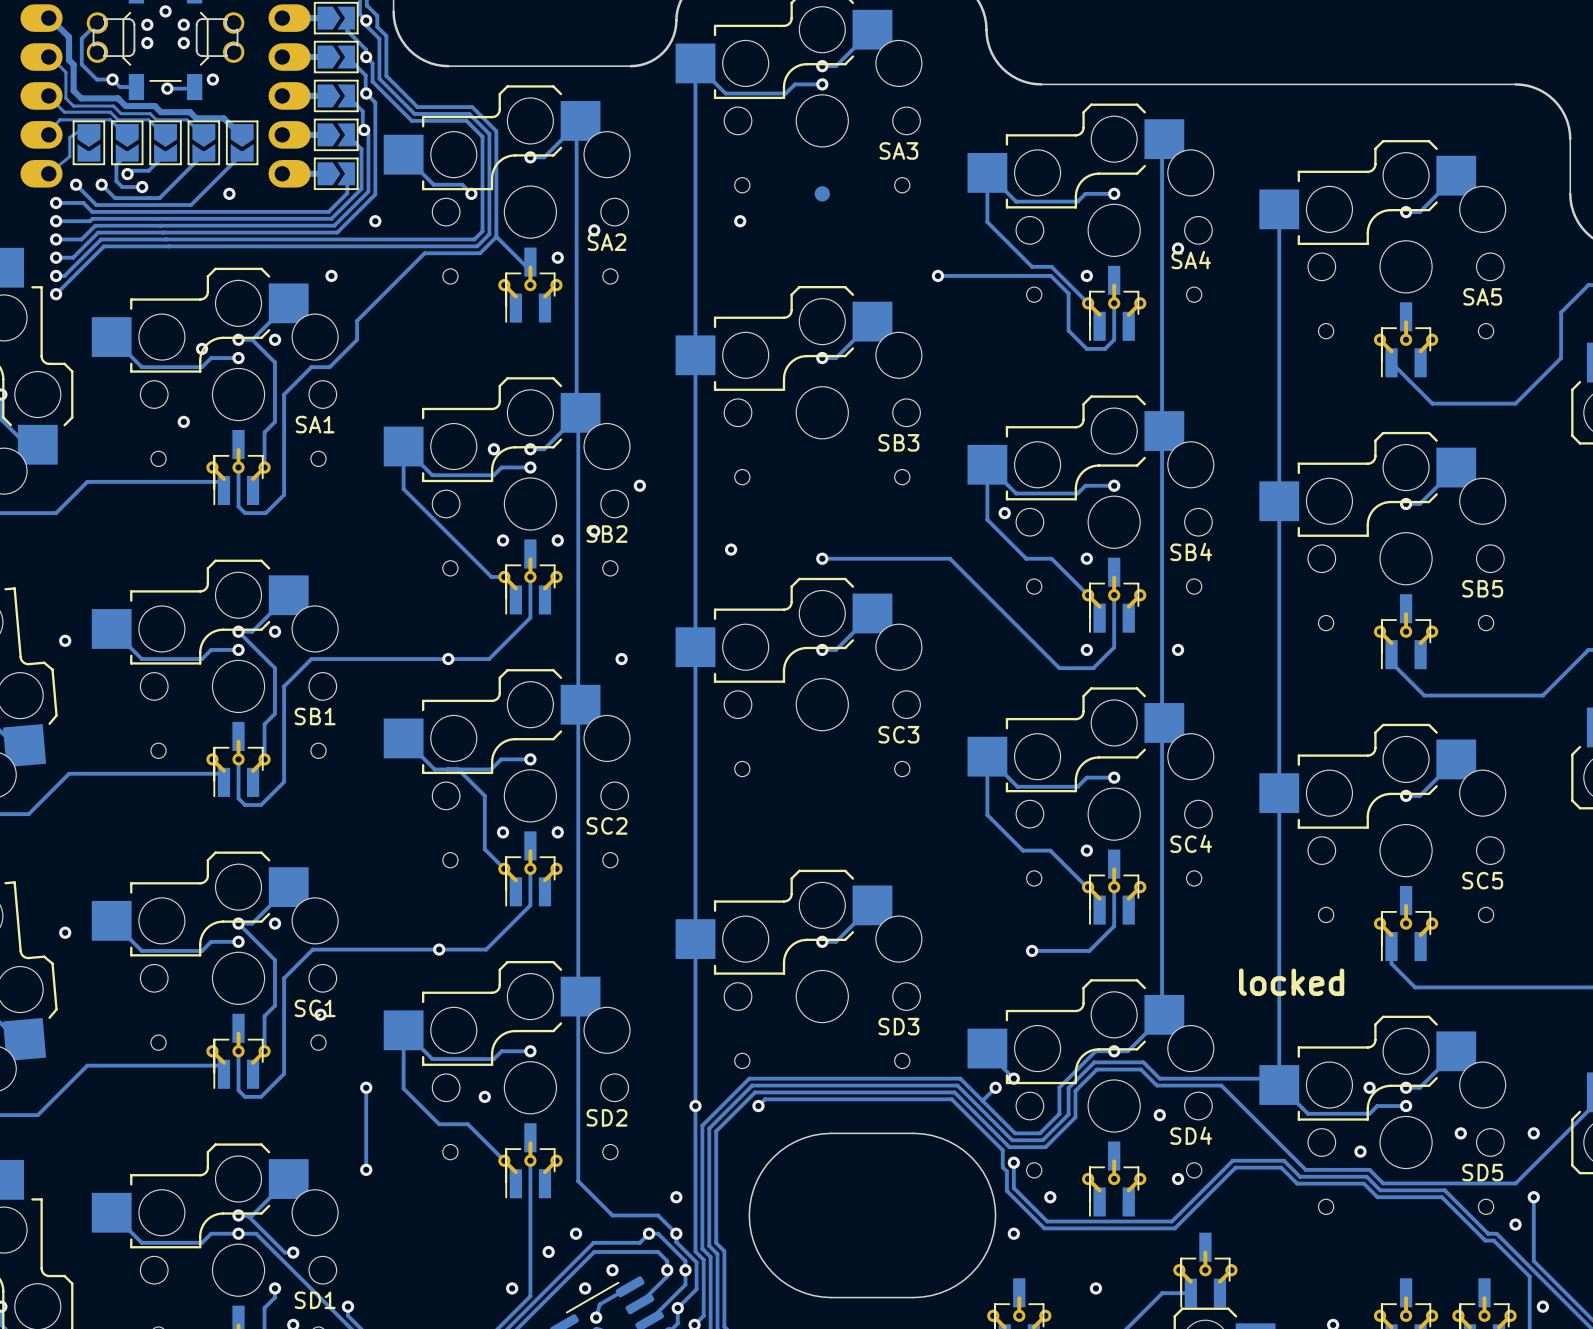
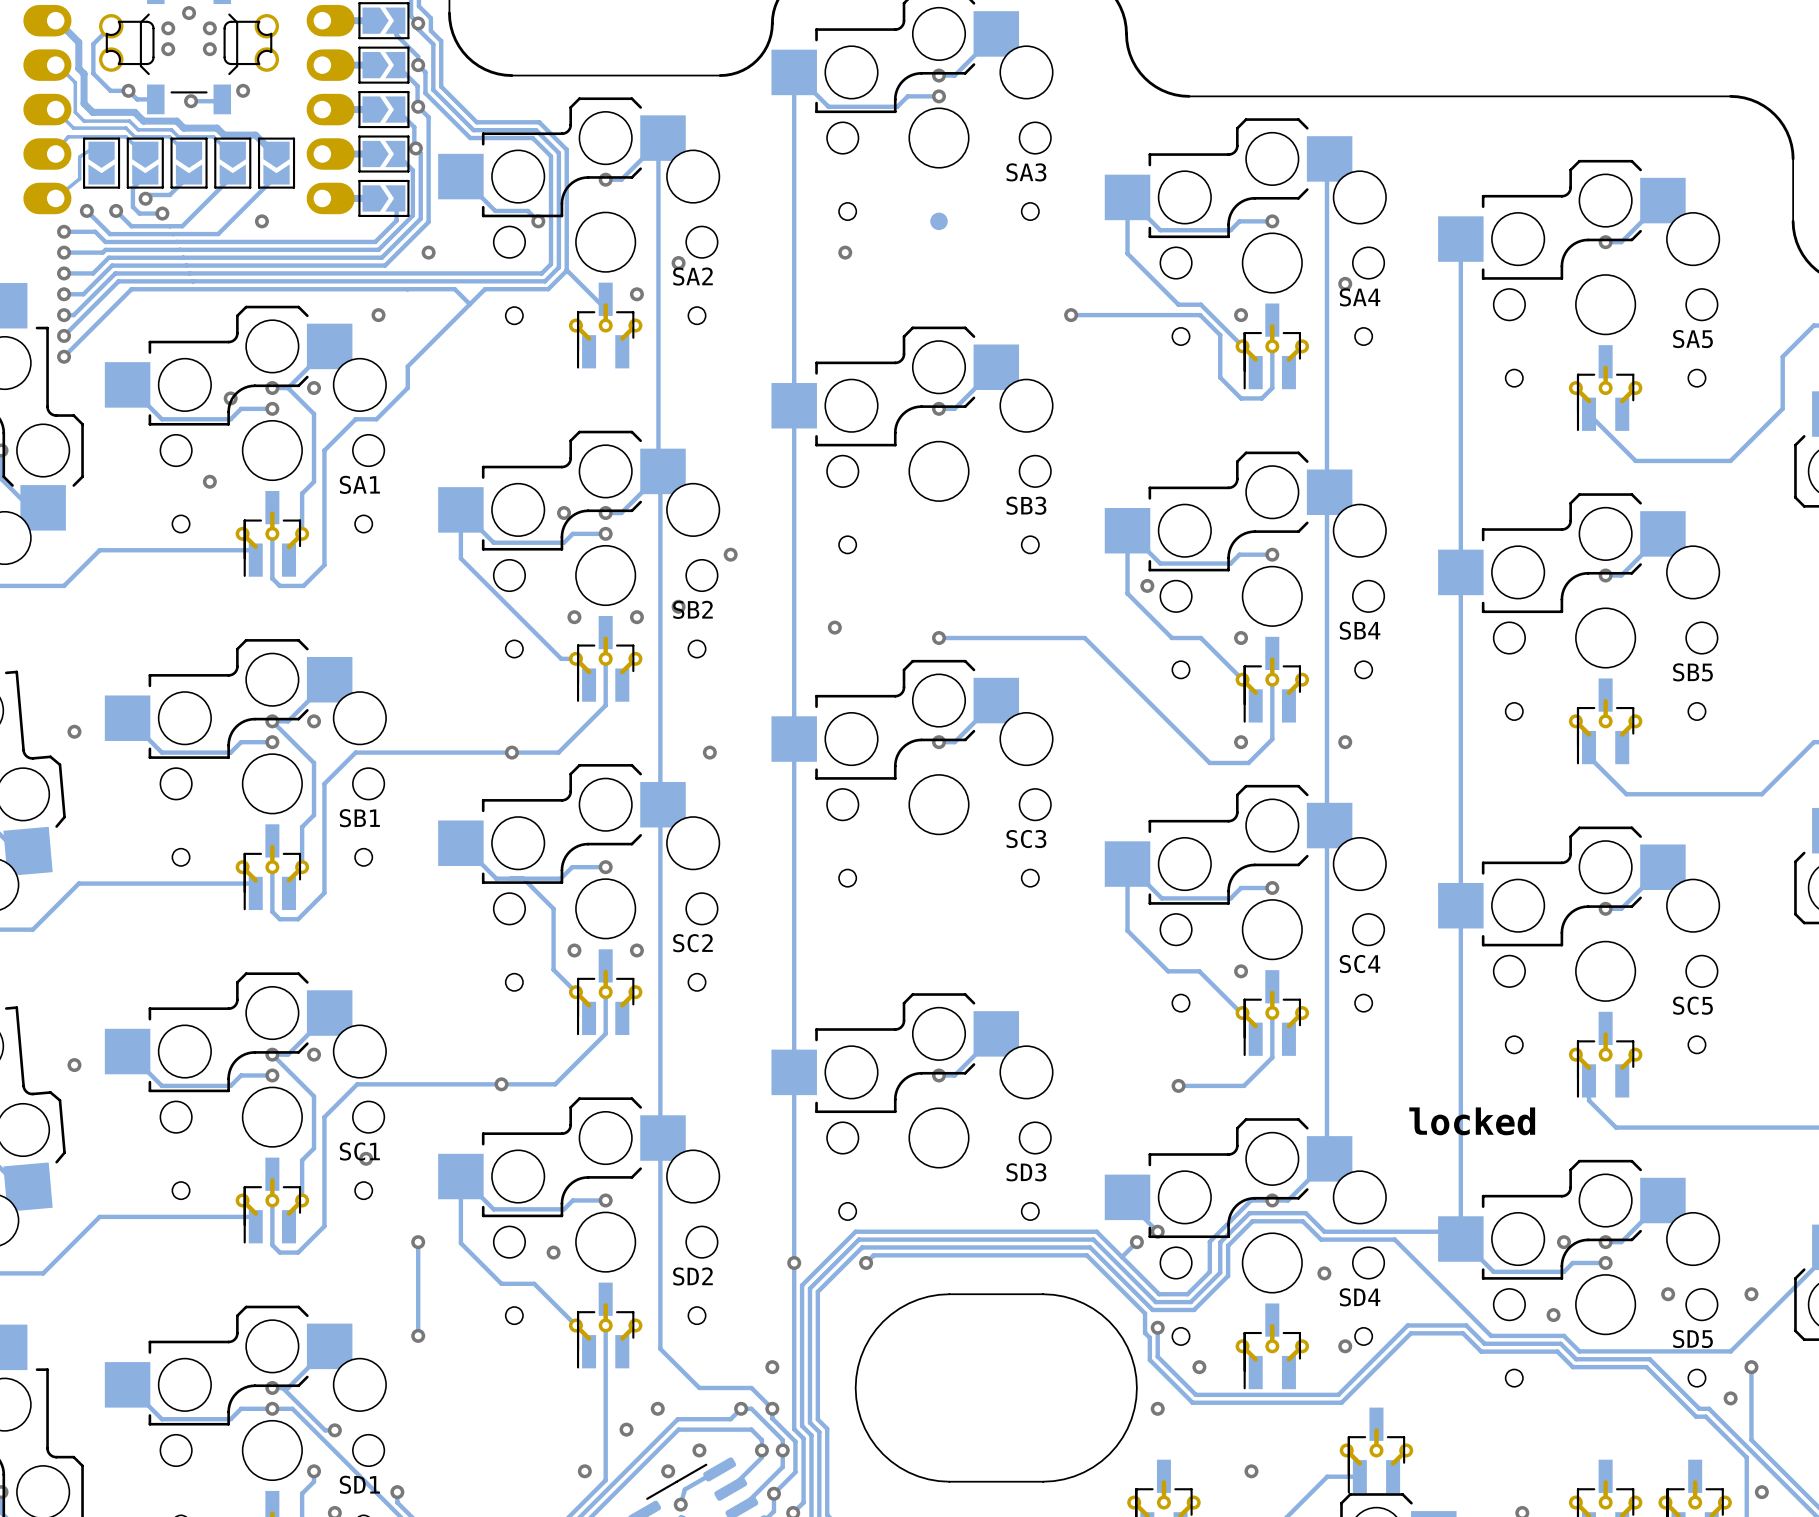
track: none -> (407, 289) (454, 289) (469, 304)
track: none -> (407, 289) (131, 289) (64, 356)
via: none -> (64, 356)

